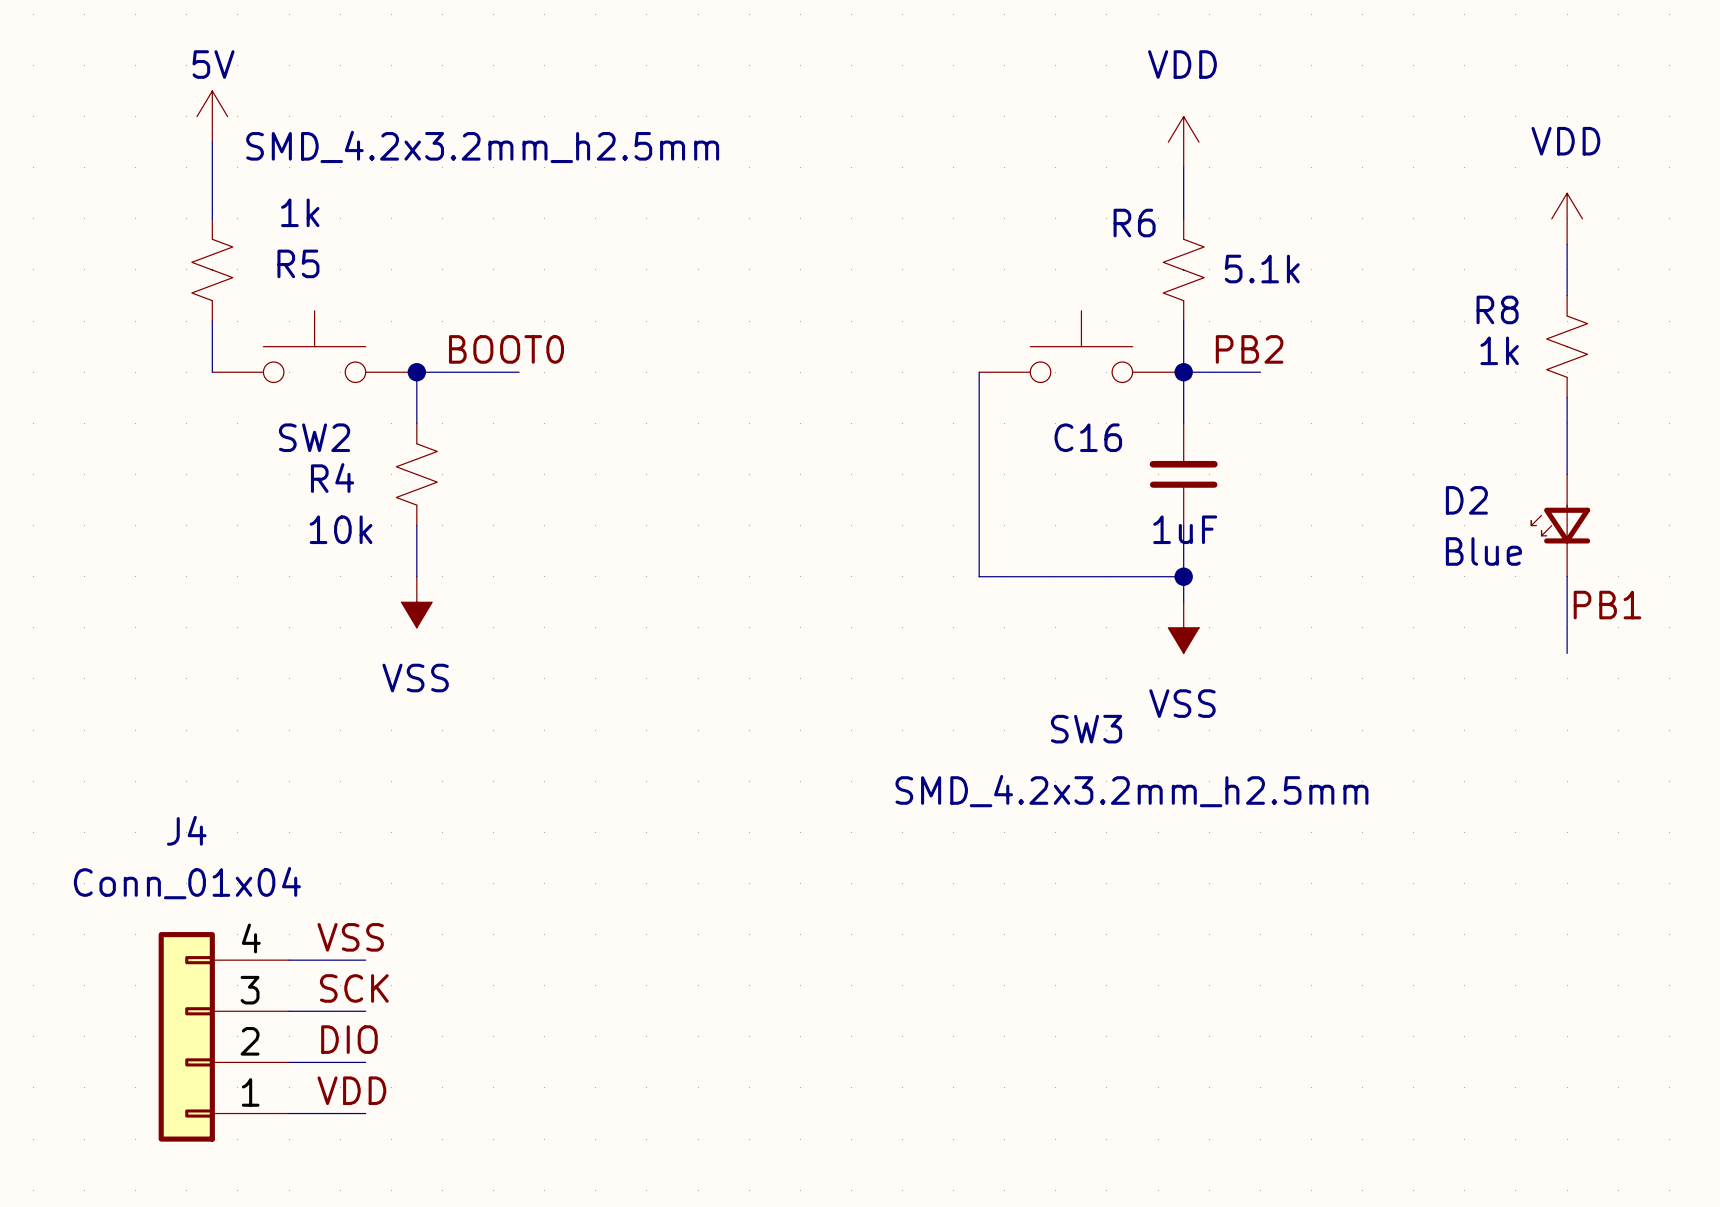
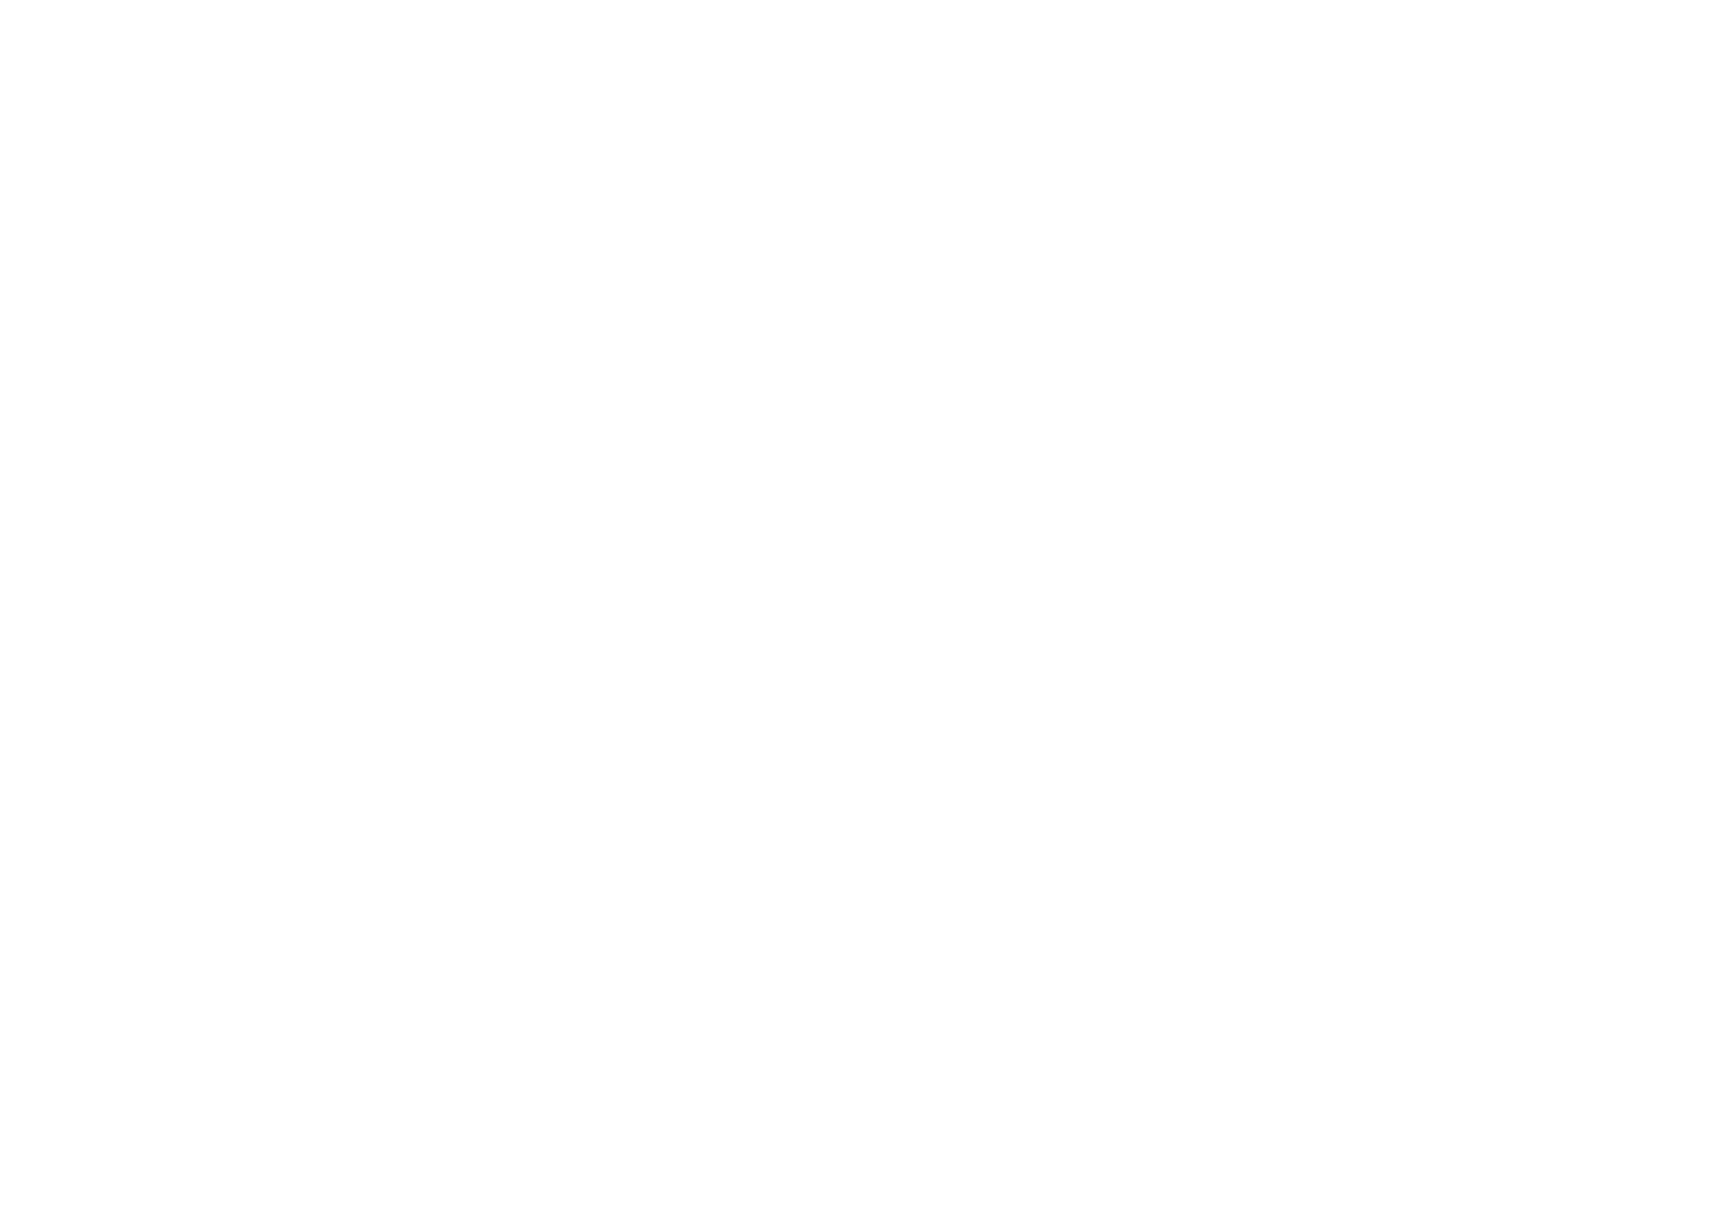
power symbol: 5V (212, 116) -> none
wire: (212, 142) (212, 218) -> none
power symbol: VDD (1183, 142) -> none
wire: (1183, 167) (1183, 218) -> none
power symbol: VDD (1567, 218) -> none
wire: (1567, 244) (1567, 295) -> none
R5: 1k (212, 269) -> none
R6: 5.1k (1183, 269) -> none
wire: (212, 321) (212, 372) -> none
wire: (1183, 321) (1183, 423) -> none
SW2: SMD_4.2x3.2mm_h2.5mm (314, 346) -> none
SW3: SMD_4.2x3.2mm_h2.5mm (1081, 346) -> none
R8: 1k (1567, 346) -> none
label: BOOT0 (506, 349) -> none
label: PB2 (1249, 349) -> none
junction: (416, 372) -> none
wire: (519, 372) (416, 372) (416, 423) -> none
wire: (979, 372) (979, 576) (1183, 576) -> none
wire: (1183, 372) (1260, 372) -> none
junction: (1183, 372) -> none
wire: (1567, 397) (1567, 474) -> none
R4: 10k (416, 474) -> none
C16: 1uF (1183, 474) -> none
wire: (416, 525) (416, 576) -> none
wire: (1183, 525) (1183, 602) -> none
D2: Blue (1560, 525) -> none
junction: (1183, 576) -> none
wire: (1567, 576) (1567, 653) -> none
power symbol: VSS (416, 602) -> none
label: PB1 (1607, 605) -> none
power symbol: VSS (1183, 627) -> none
label: VSS (350, 937) -> none
wire: (289, 960) (365, 960) -> none
label: SCK (354, 988) -> none
wire: (289, 1011) (365, 1011) -> none
J4: Conn_01x04 (223, 1036) -> none
label: DIO (349, 1039) -> none
wire: (289, 1062) (365, 1062) -> none
label: VDD (351, 1090) -> none
wire: (289, 1113) (365, 1113) -> none

